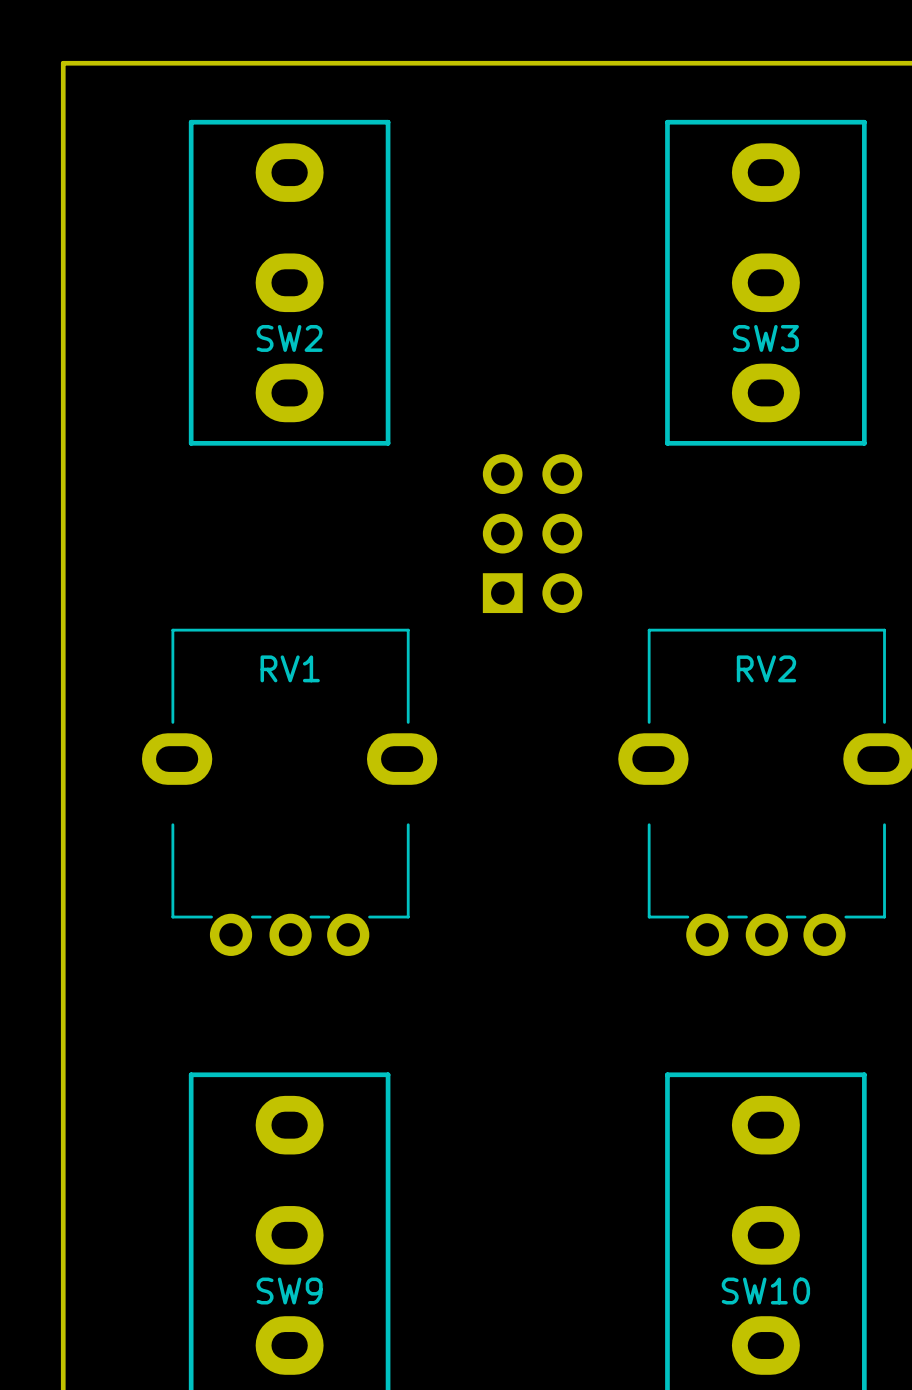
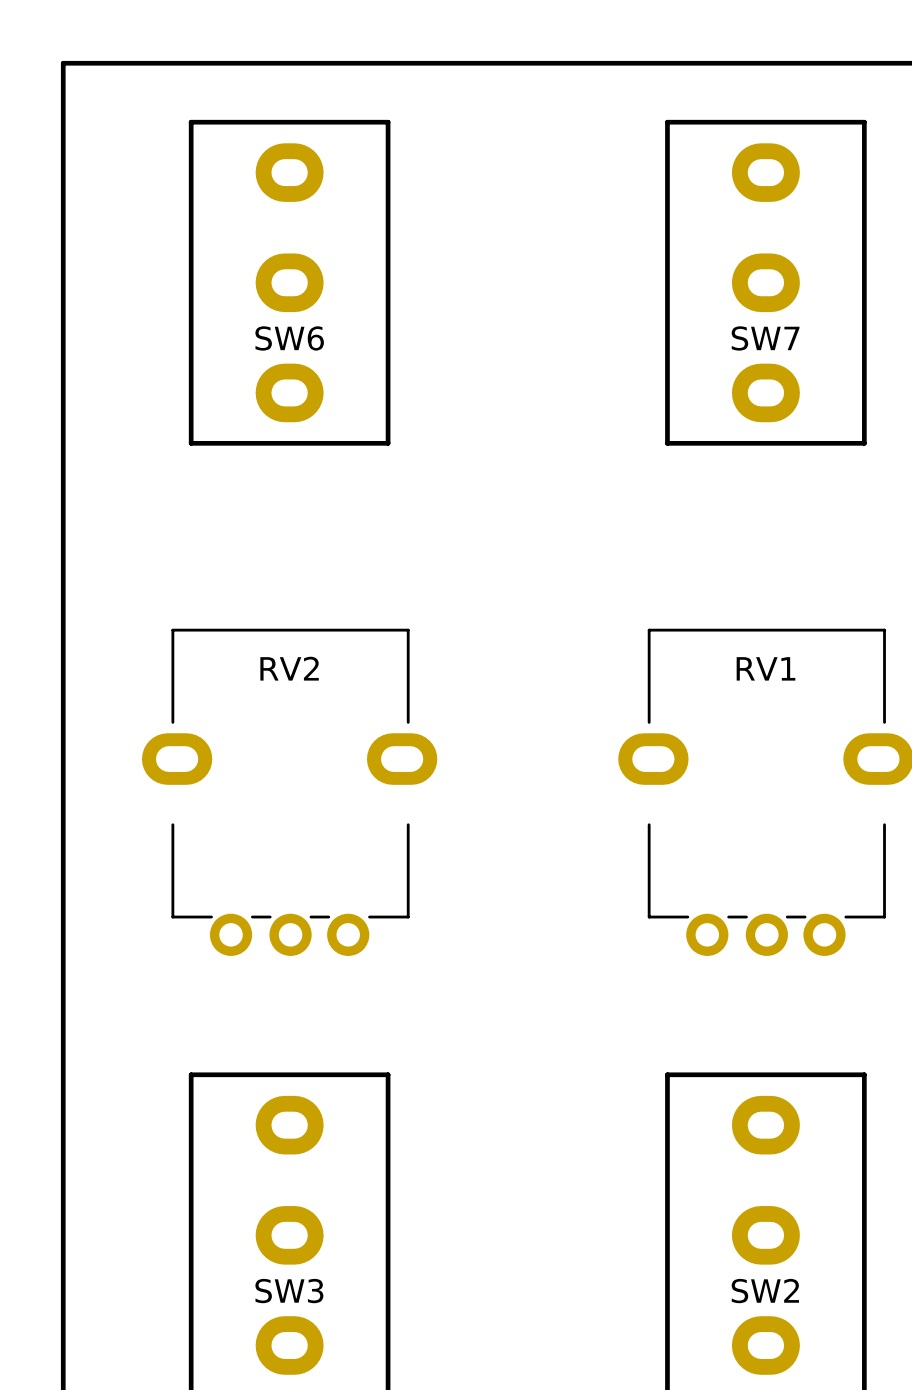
SW2 name: SW2 (289, 338) -> SW6 (289, 338)
SW3 name: SW3 (765, 338) -> SW7 (765, 338)
part: (532, 533) -> none
RV1 name: RV1 (290, 668) -> RV2 (289, 668)
RV2 name: RV2 (766, 668) -> RV1 (766, 668)
SW9 name: SW9 (289, 1291) -> SW3 (289, 1291)
SW10 name: SW10 (765, 1291) -> SW2 (765, 1291)

